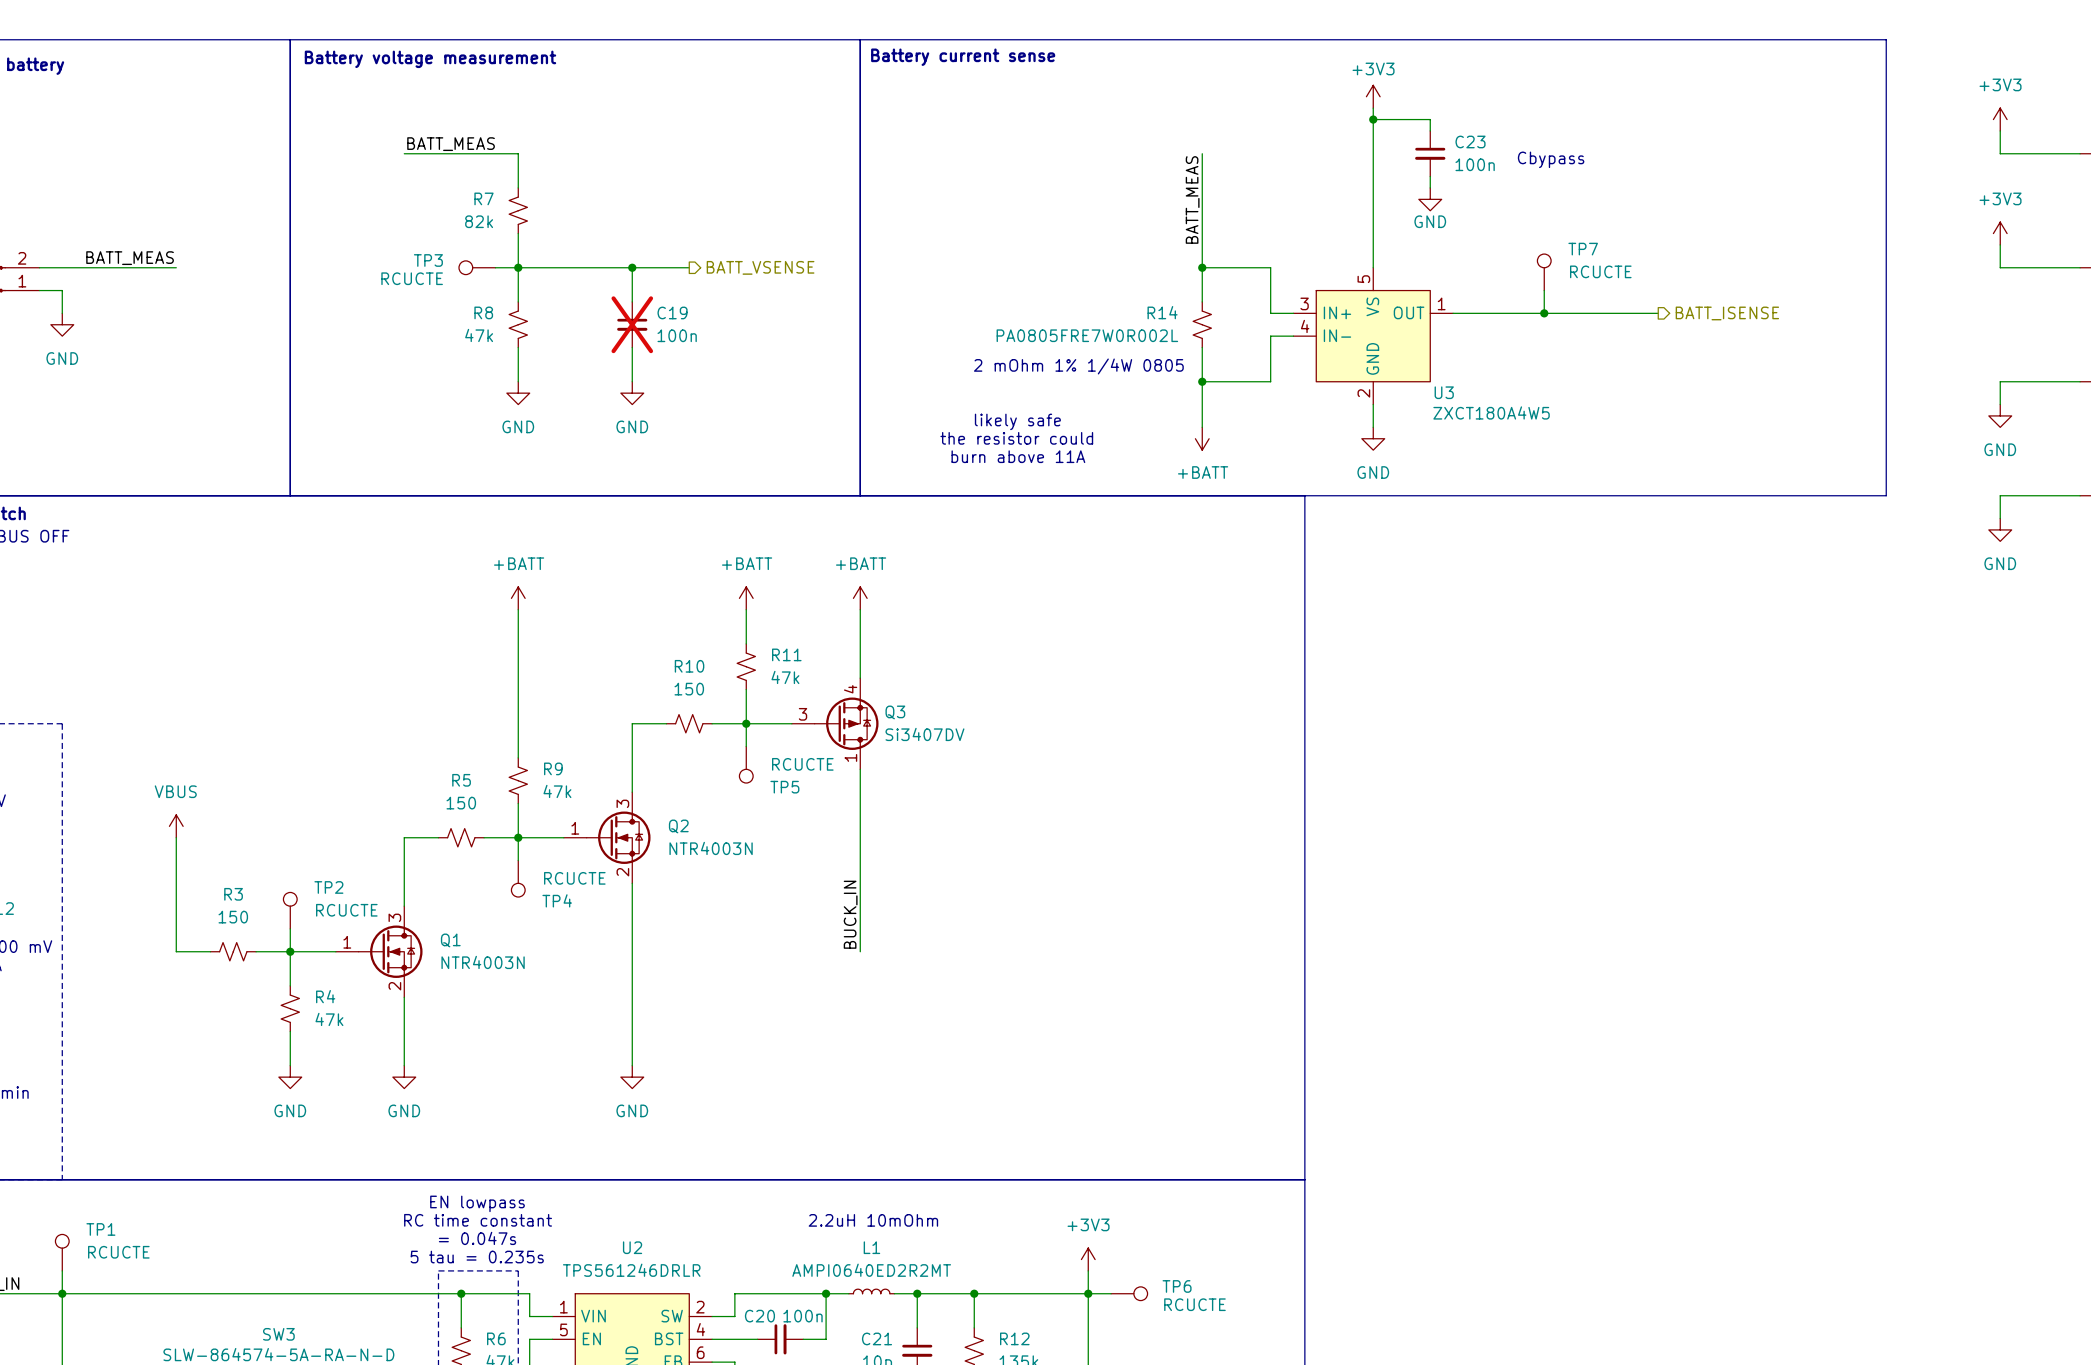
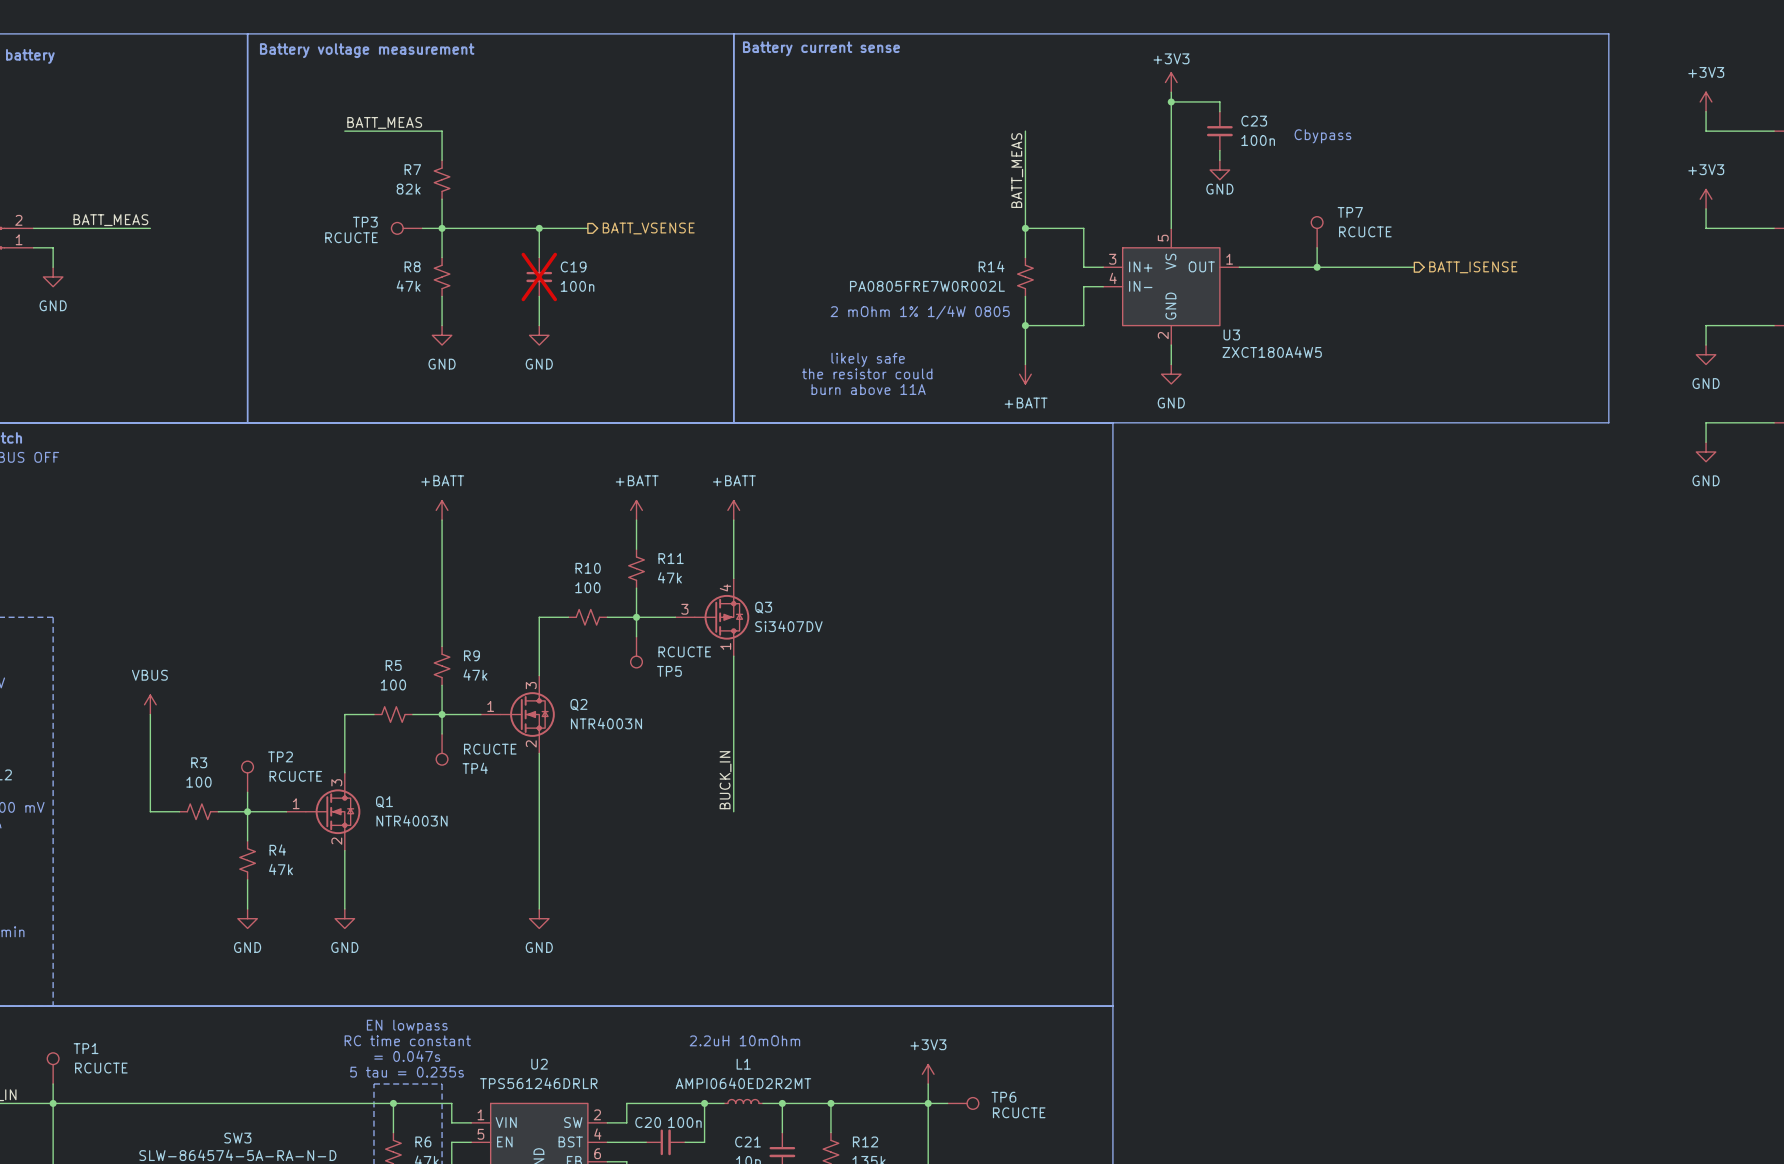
R10 value: 150 (689, 689) -> 100 (587, 587)
R5 value: 150 (461, 803) -> 100 (393, 684)
R3 value: 150 (233, 917) -> 100 (198, 782)

